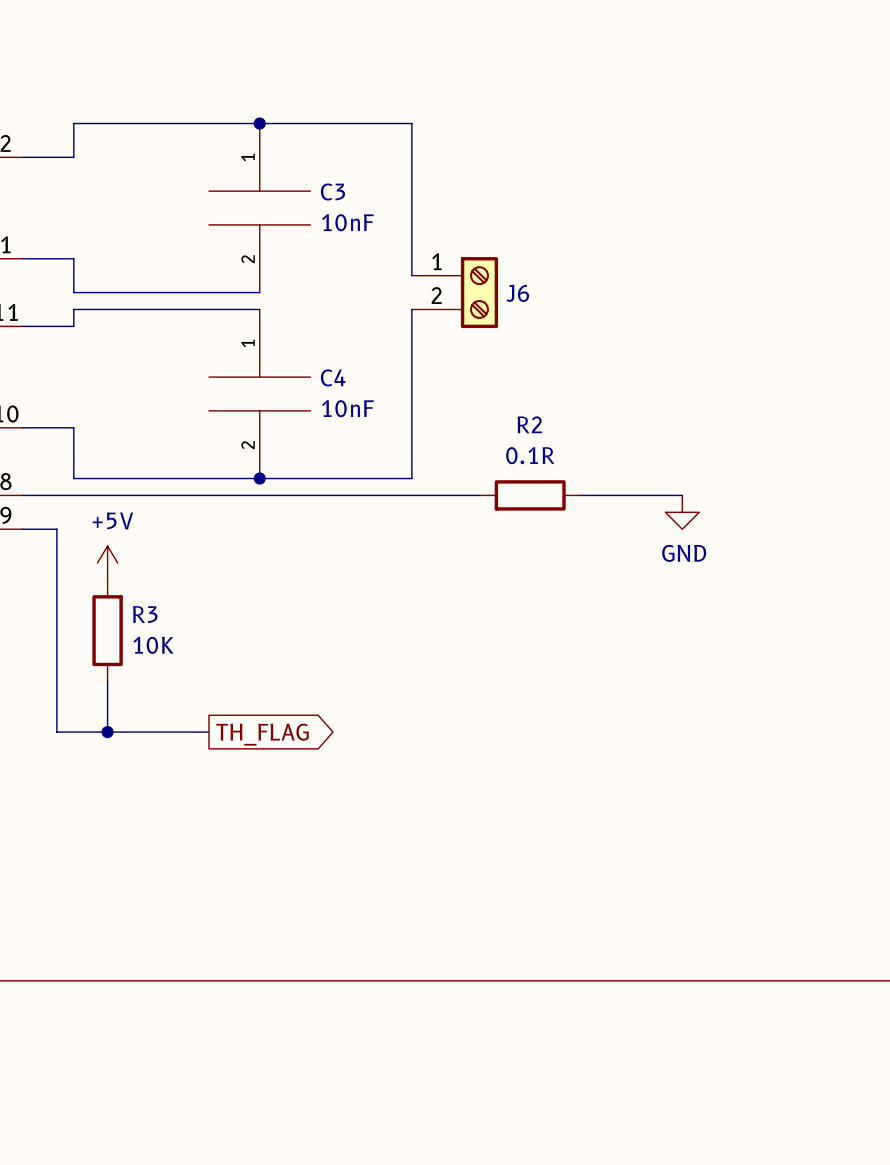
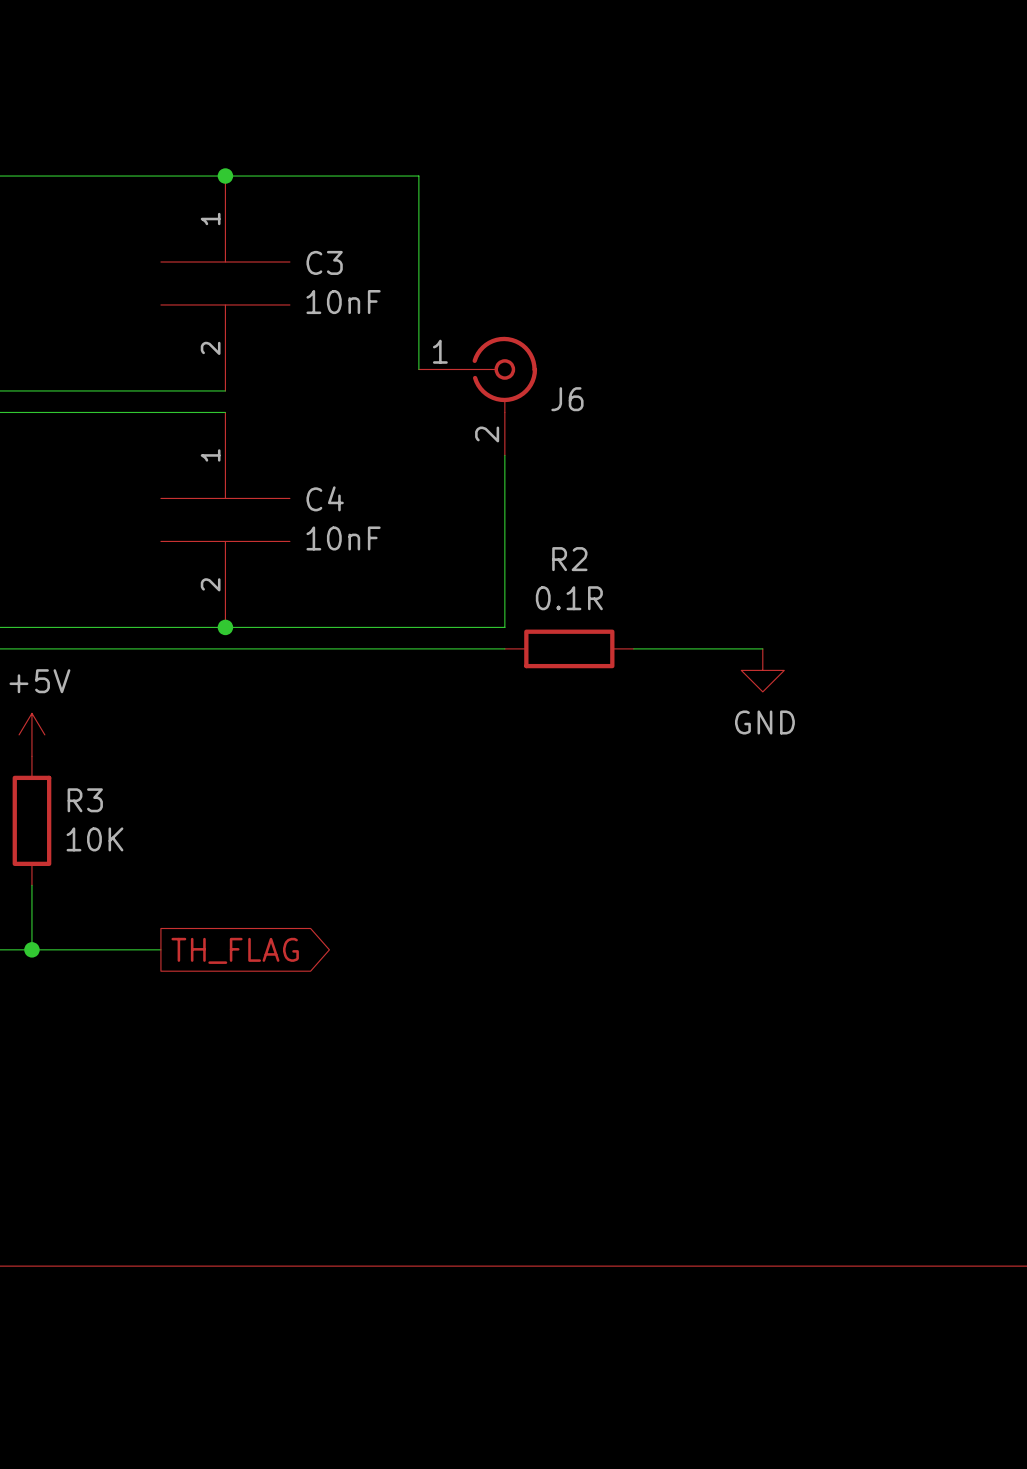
J6 symbol: [411, 257, 499, 329] -> [418, 336, 538, 456]
wire: (411, 309) (411, 478) -> (504, 455) (504, 627) (418, 627)

